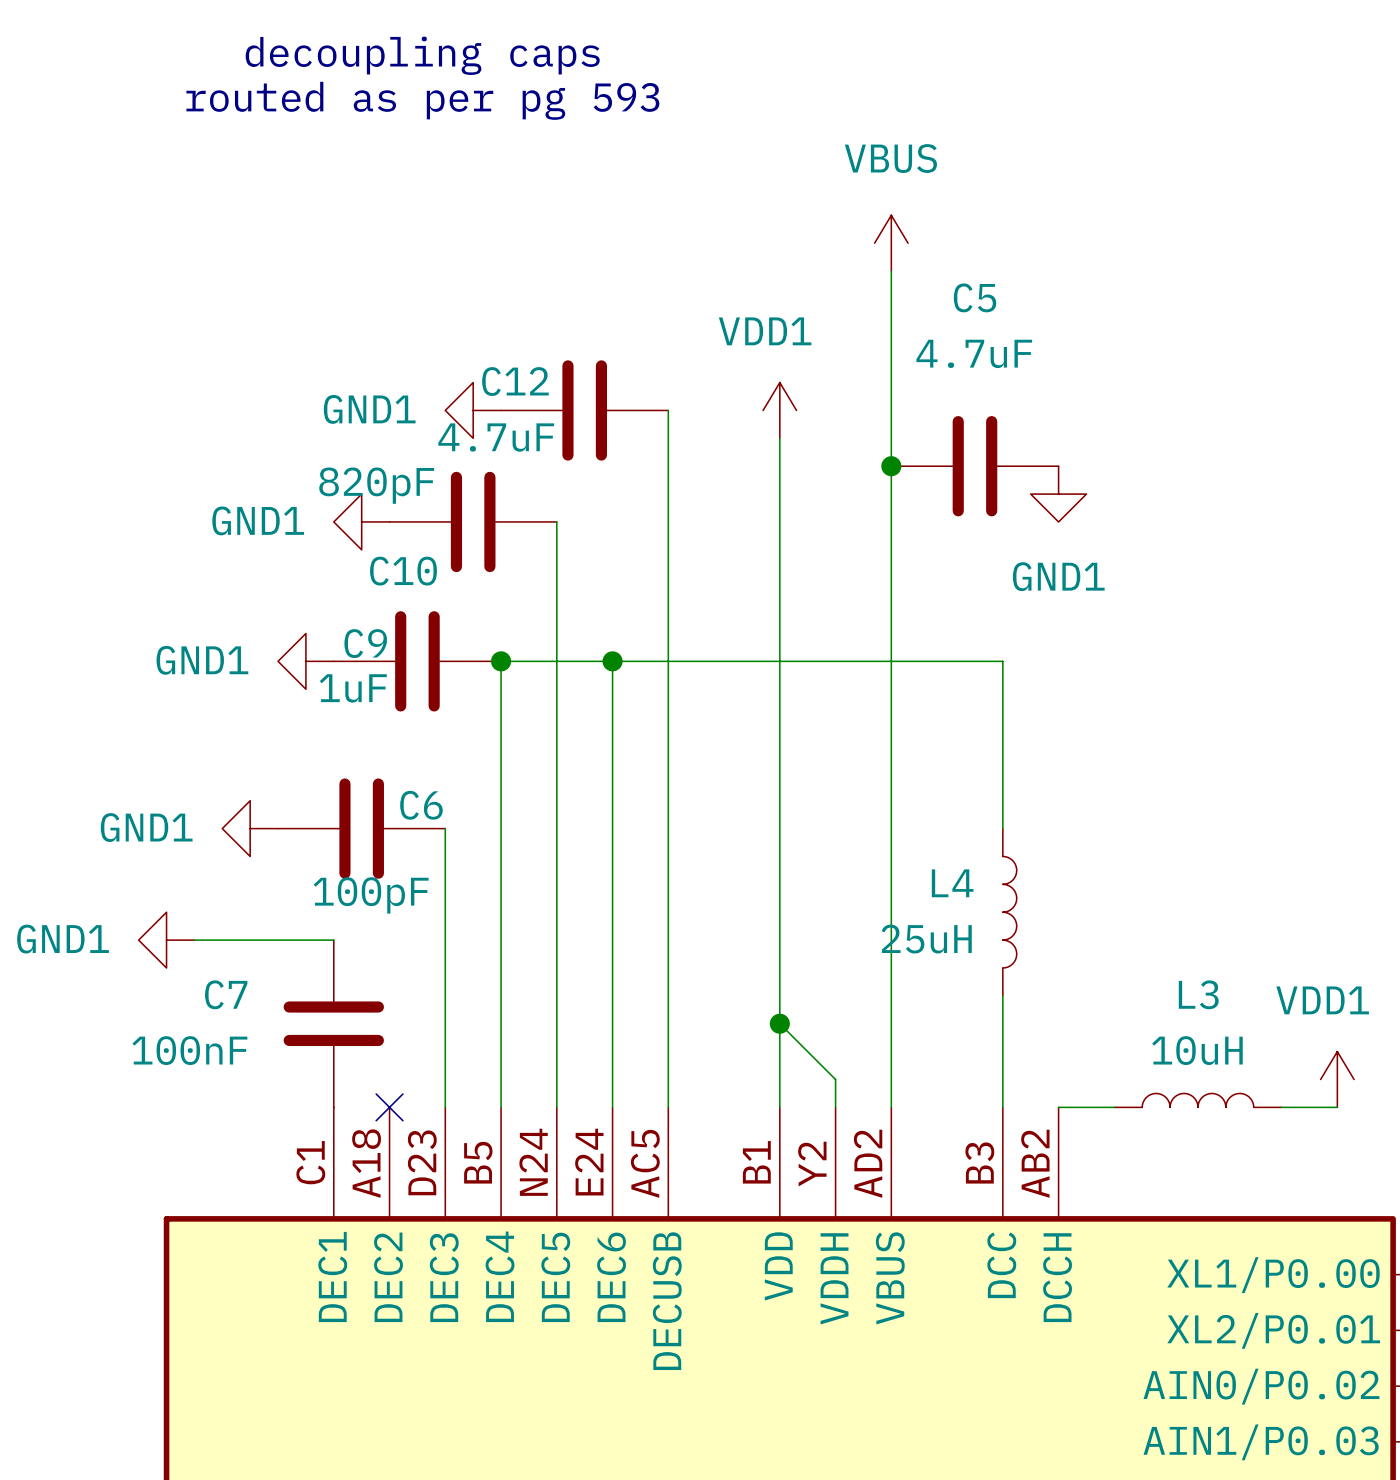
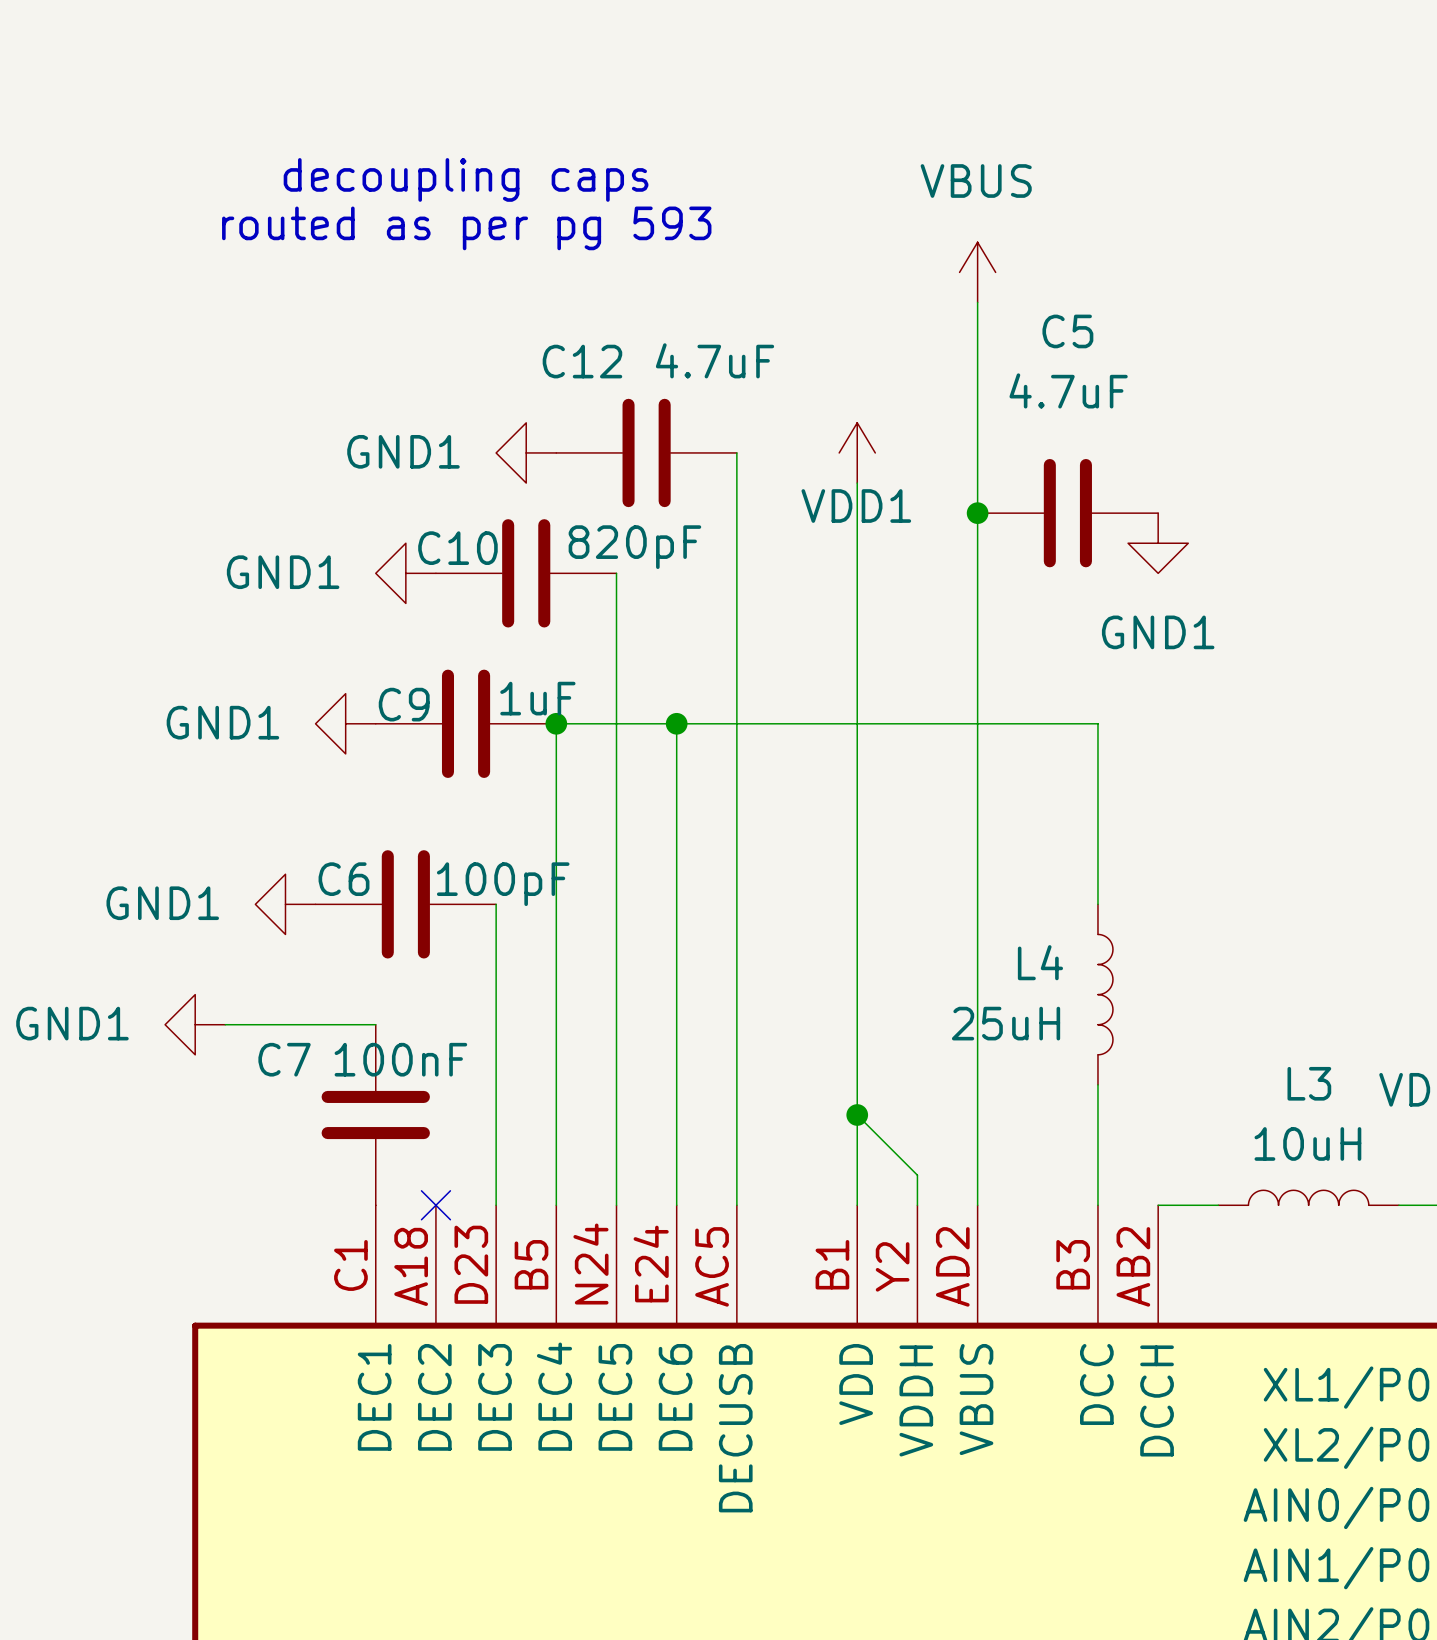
text position: decoupling caps (422, 55) -> decoupling caps (466, 179)
text position: routed as per pg 593 (422, 100) -> routed as per pg 593 (466, 228)
power symbol text position: VDD1 (765, 331) -> VDD1 (856, 506)
C12 name position: C12 (515, 381) -> C12 (582, 361)
C12 value position: 4.7uF (496, 437) -> 4.7uF (715, 360)
C10 value position: 820pF (376, 485) -> 820pF (634, 547)
C10 name position: C10 (403, 571) -> C10 (457, 548)
C9 value position: 1uF (353, 688) -> 1uF (537, 698)
C6 name position: C6 (421, 805) -> C6 (344, 879)
C6 value position: 100pF (371, 895) -> 100pF (503, 884)
C7 name position: C7 (226, 994) -> C7 (284, 1059)
C7 value position: 100nF (189, 1050) -> 100nF (400, 1059)

